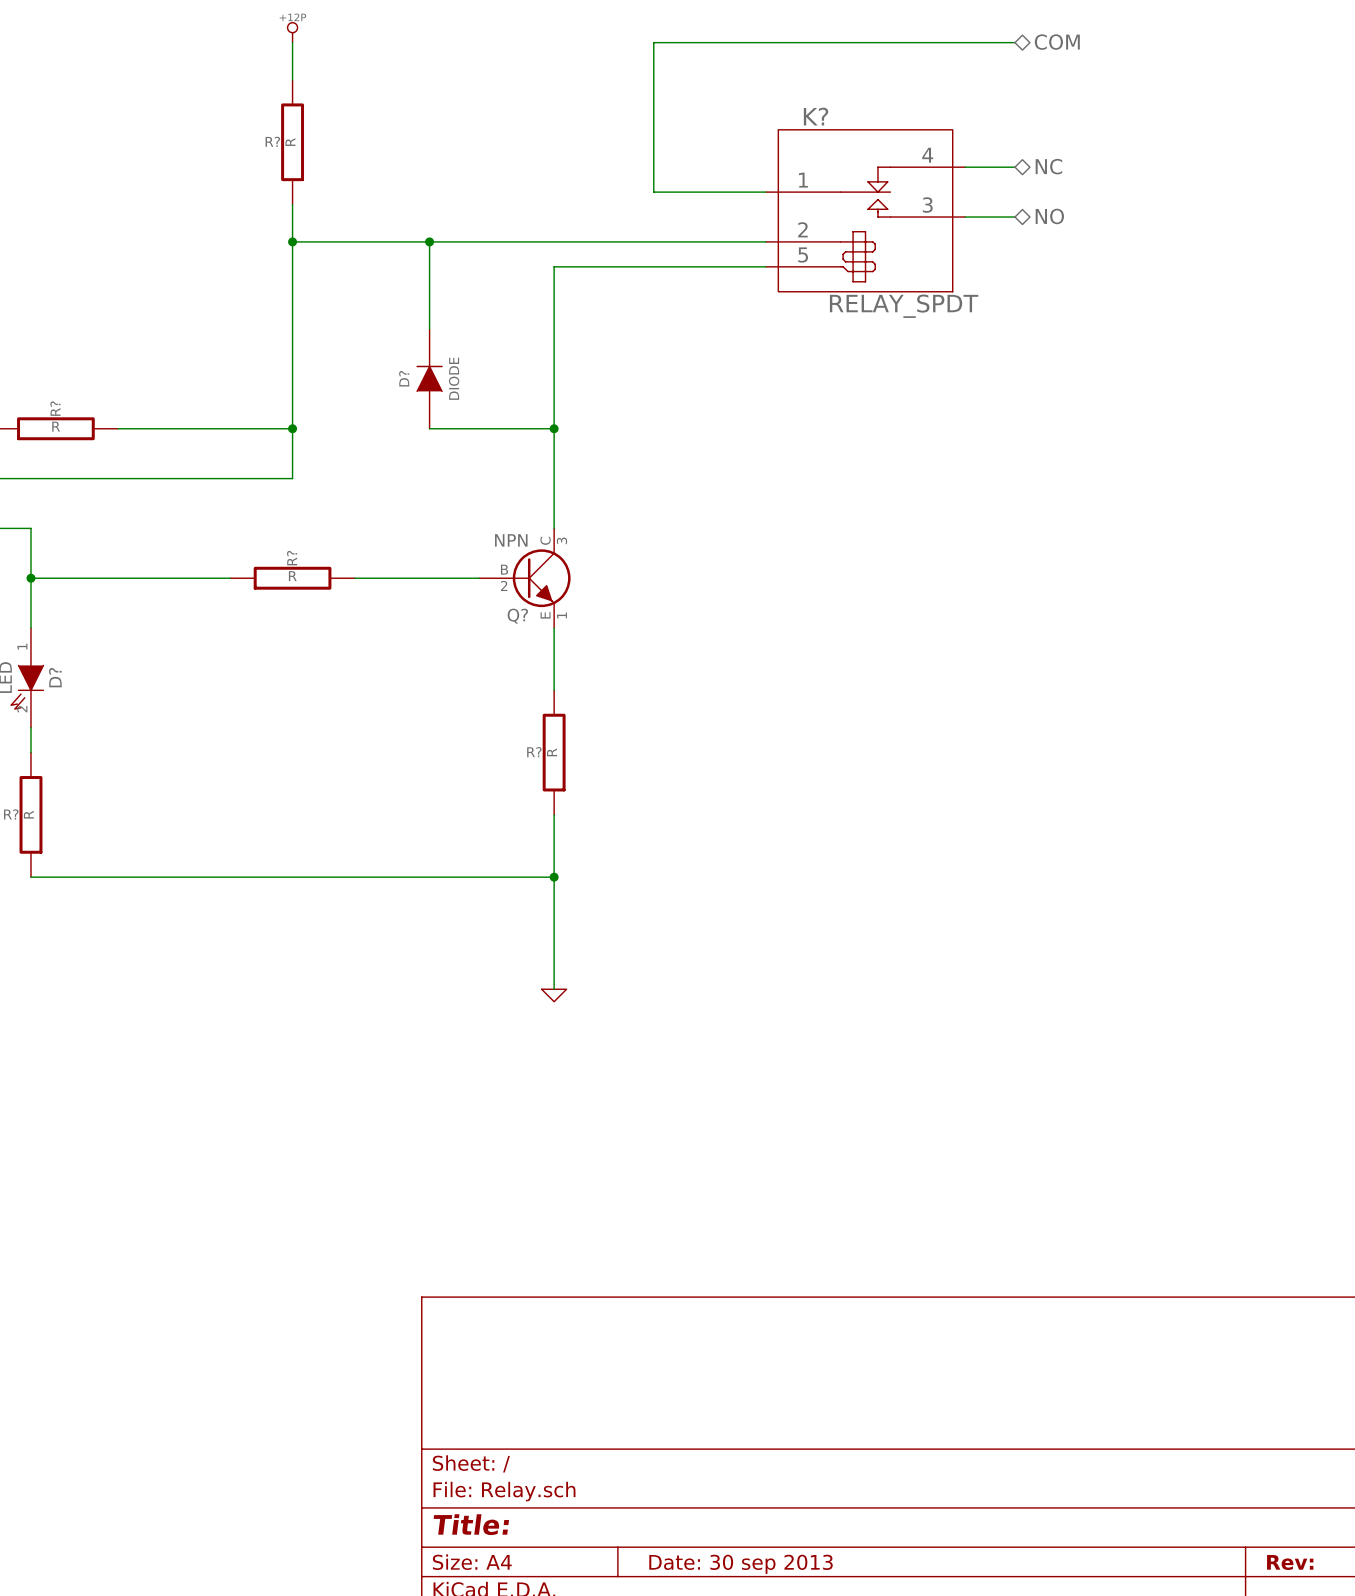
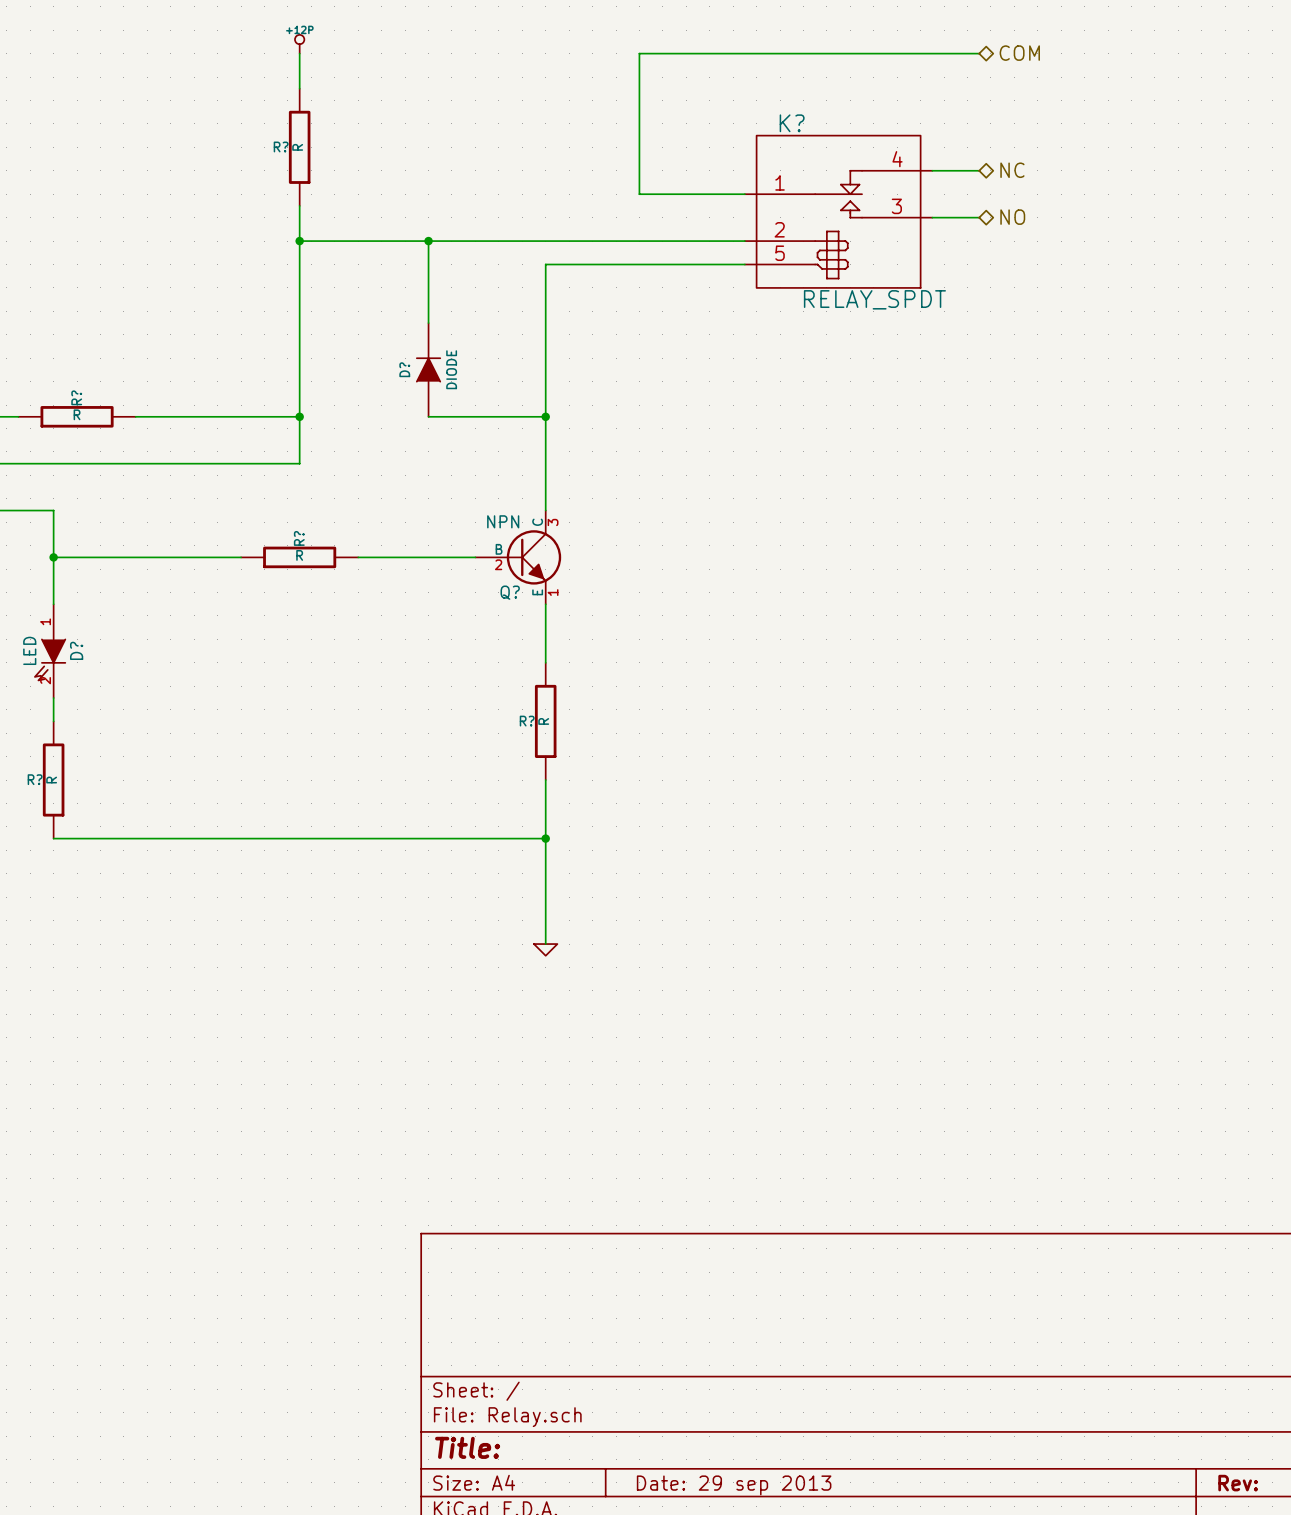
title block: Date: 30 sep 2013 (741, 1564) -> Date: 29 sep 2013 (734, 1485)

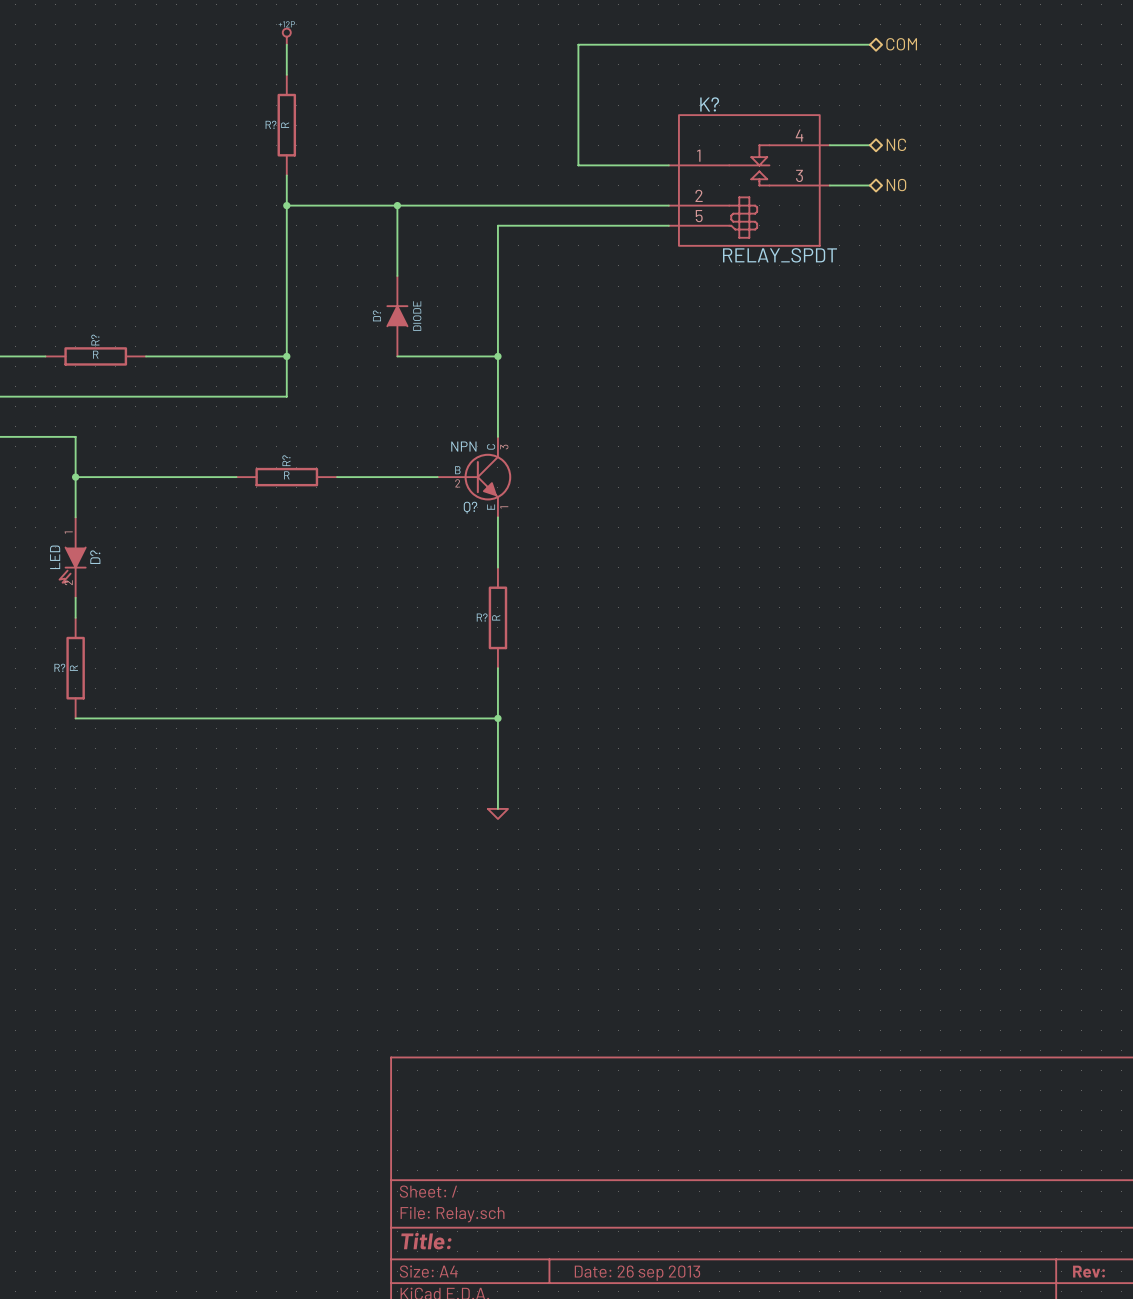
title block: Date: 29 sep 2013 (734, 1485) -> Date: 26 sep 2013 (637, 1273)

